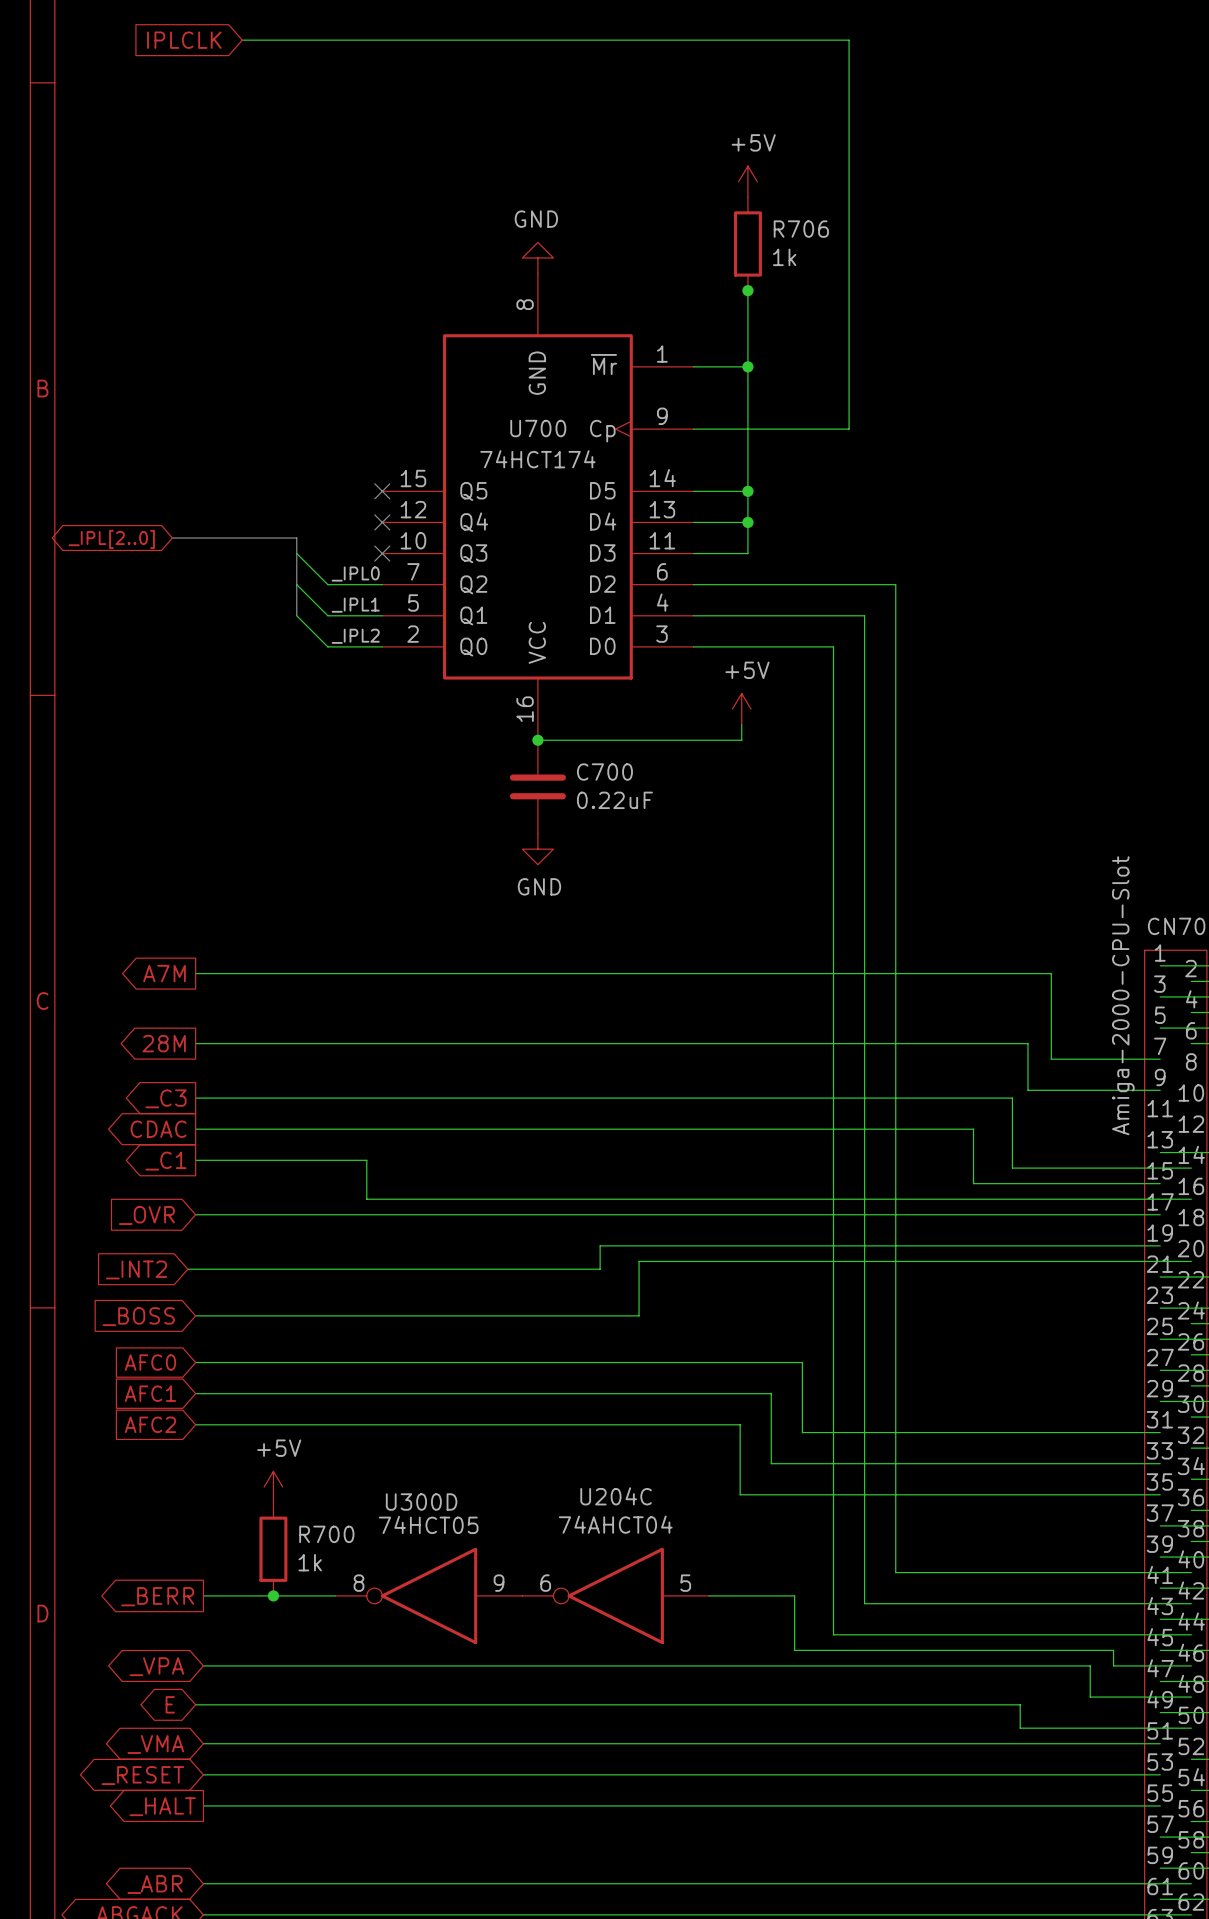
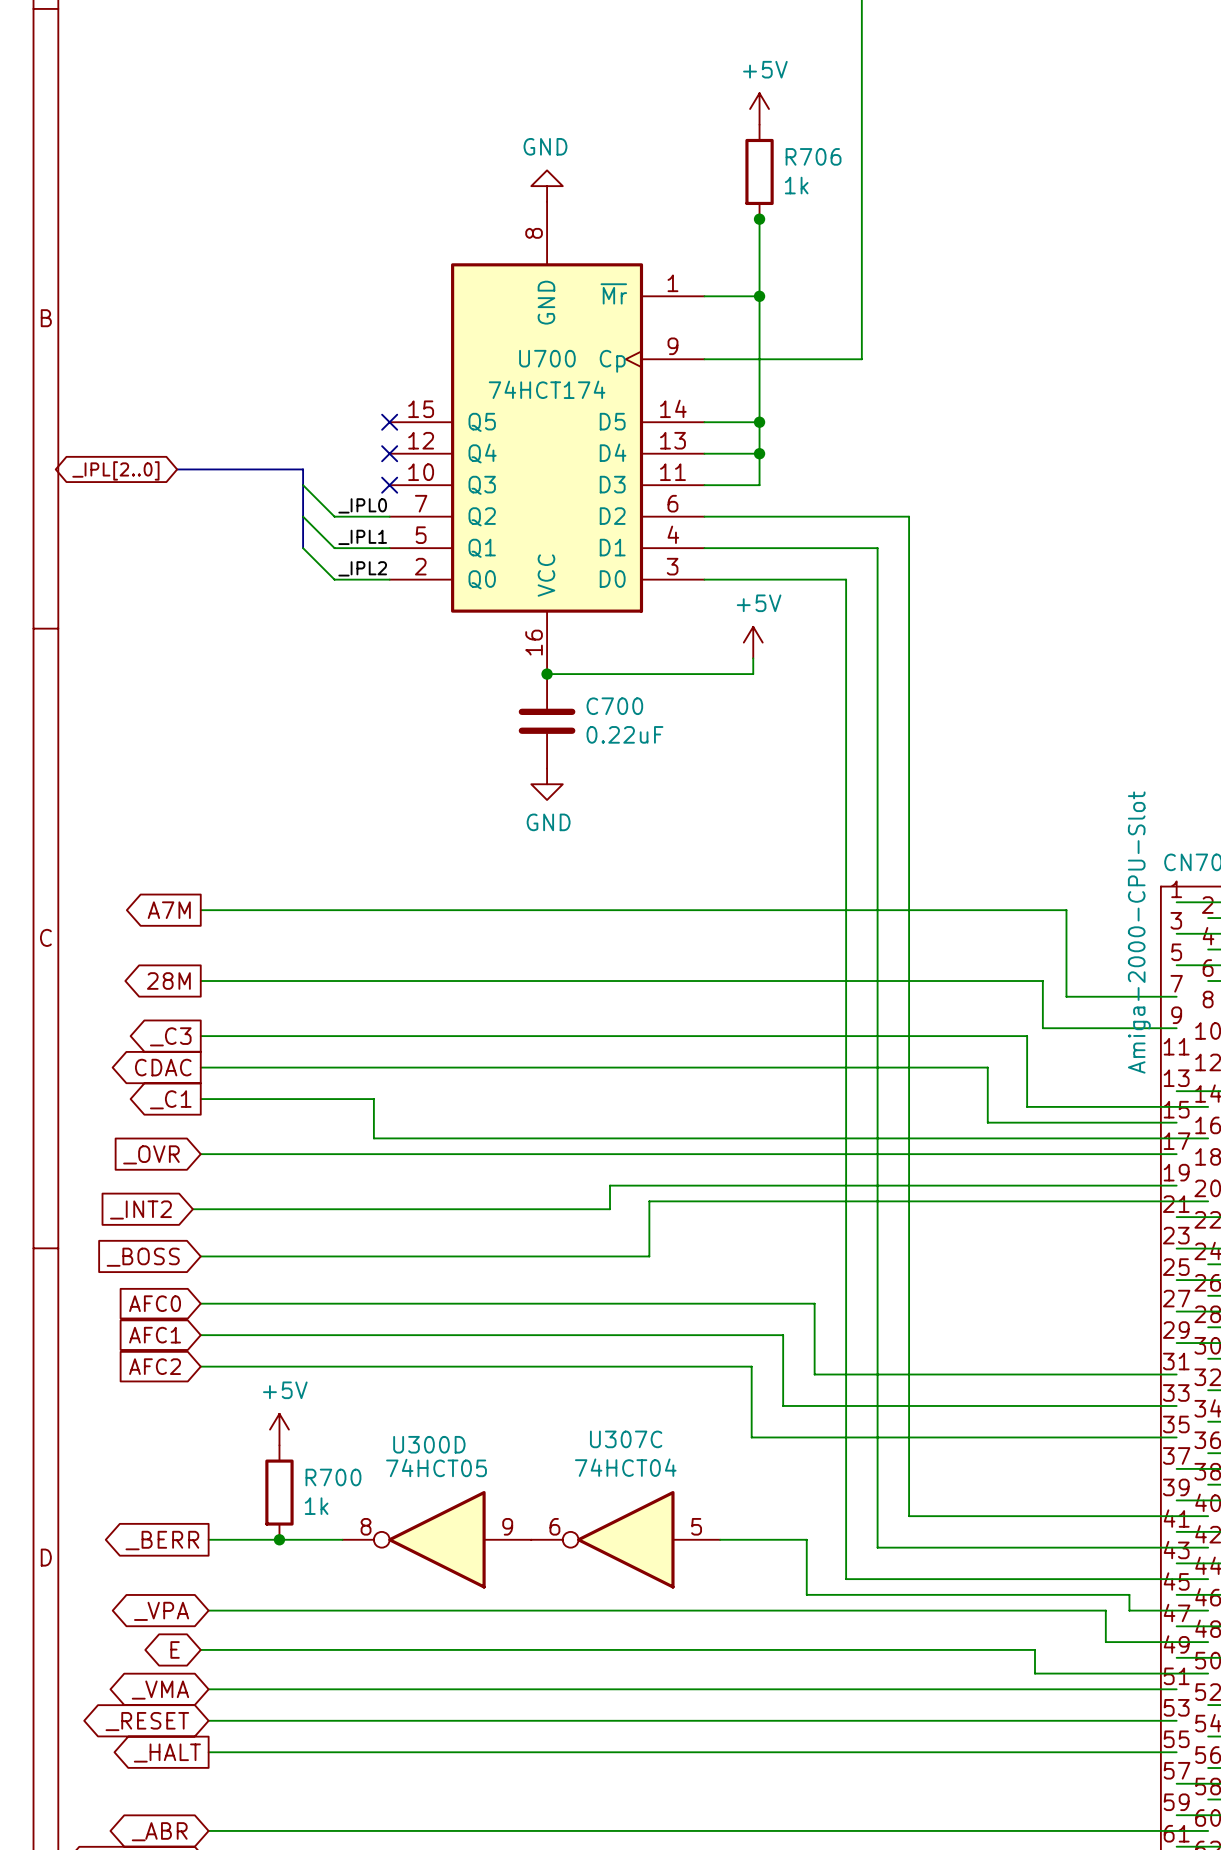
U204C name: U204C (616, 1496) -> U307C (626, 1439)
U204C value: 74AHCT04 (615, 1524) -> 74HCT04 (625, 1467)

